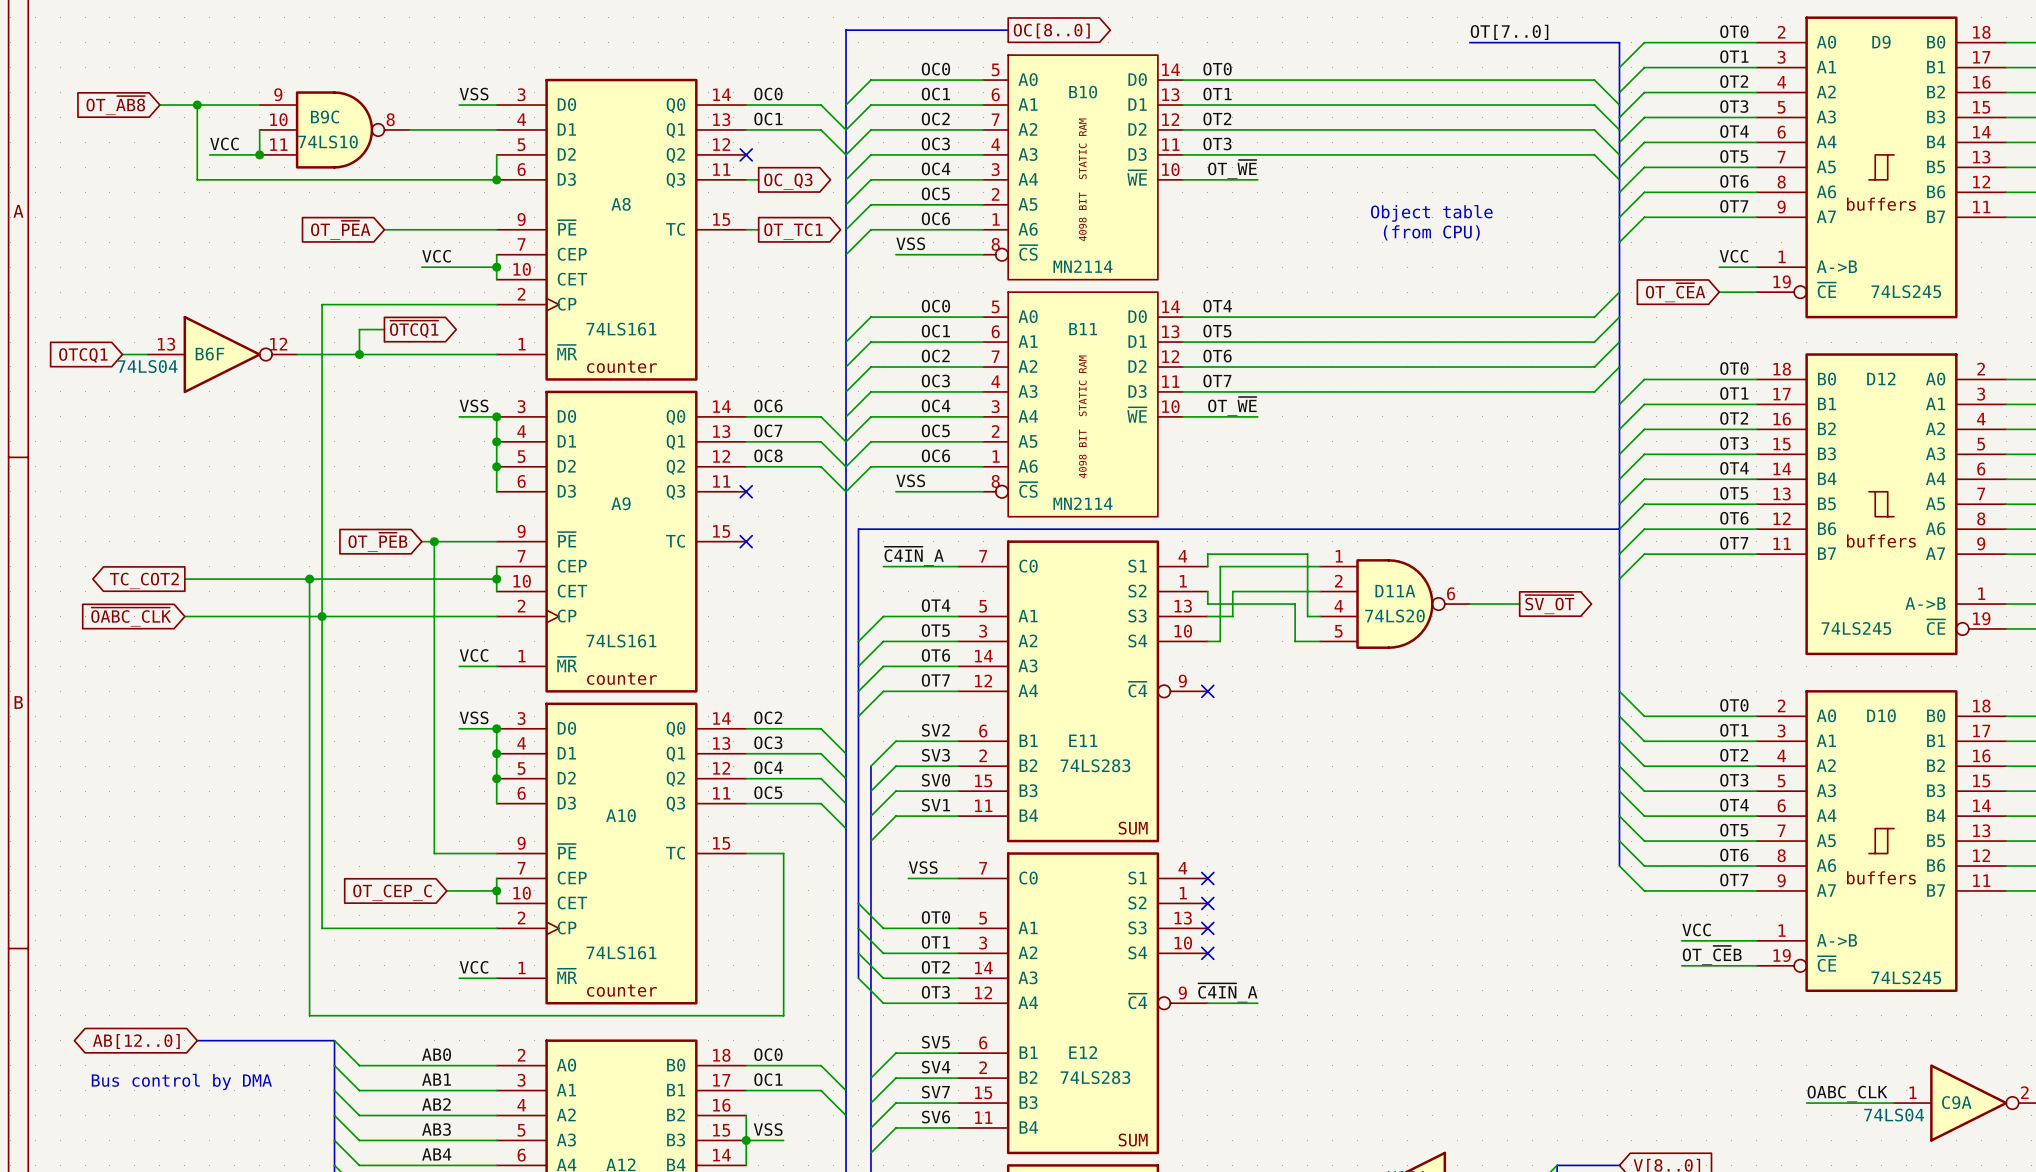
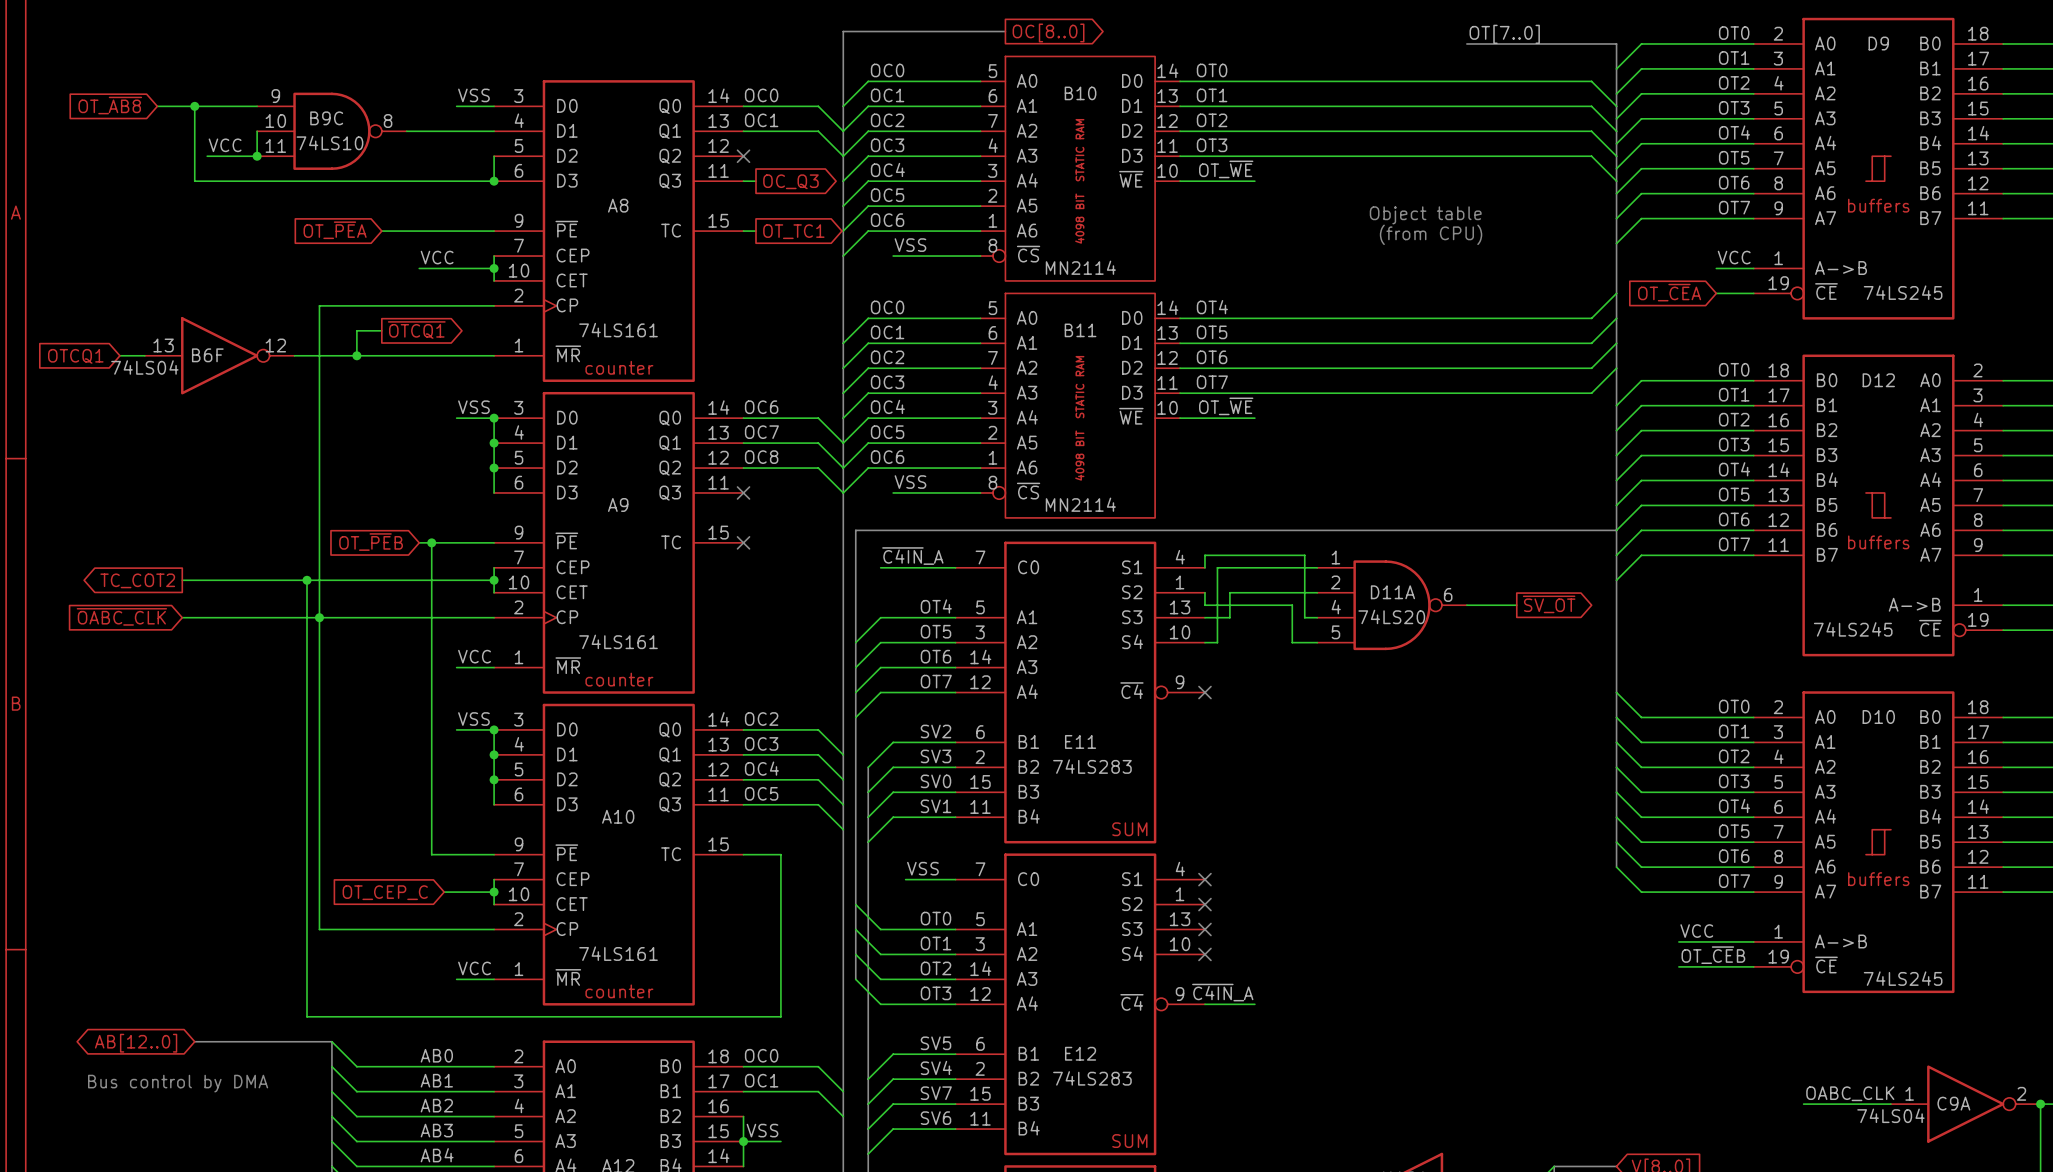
label position: OC0 (935, 69) -> OC0 (887, 70)
label position: OC1 (935, 94) -> OC1 (887, 95)
label position: OC2 (935, 119) -> OC2 (887, 120)
label position: OC3 (935, 143) -> OC3 (887, 145)
label position: OC4 (936, 168) -> OC4 (887, 169)
label position: OC5 (935, 193) -> OC5 (887, 195)
label position: OC6 (935, 218) -> OC6 (887, 220)
label position: OC0 (935, 306) -> OC0 (887, 307)
label position: OC1 (935, 331) -> OC1 (887, 332)
label position: OC2 (935, 356) -> OC2 (887, 357)
label position: OC3 (935, 381) -> OC3 (887, 382)
label position: OC4 (936, 405) -> OC4 (887, 406)
label position: OC5 (935, 430) -> OC5 (887, 432)
label position: OC6 (935, 455) -> OC6 (887, 457)

